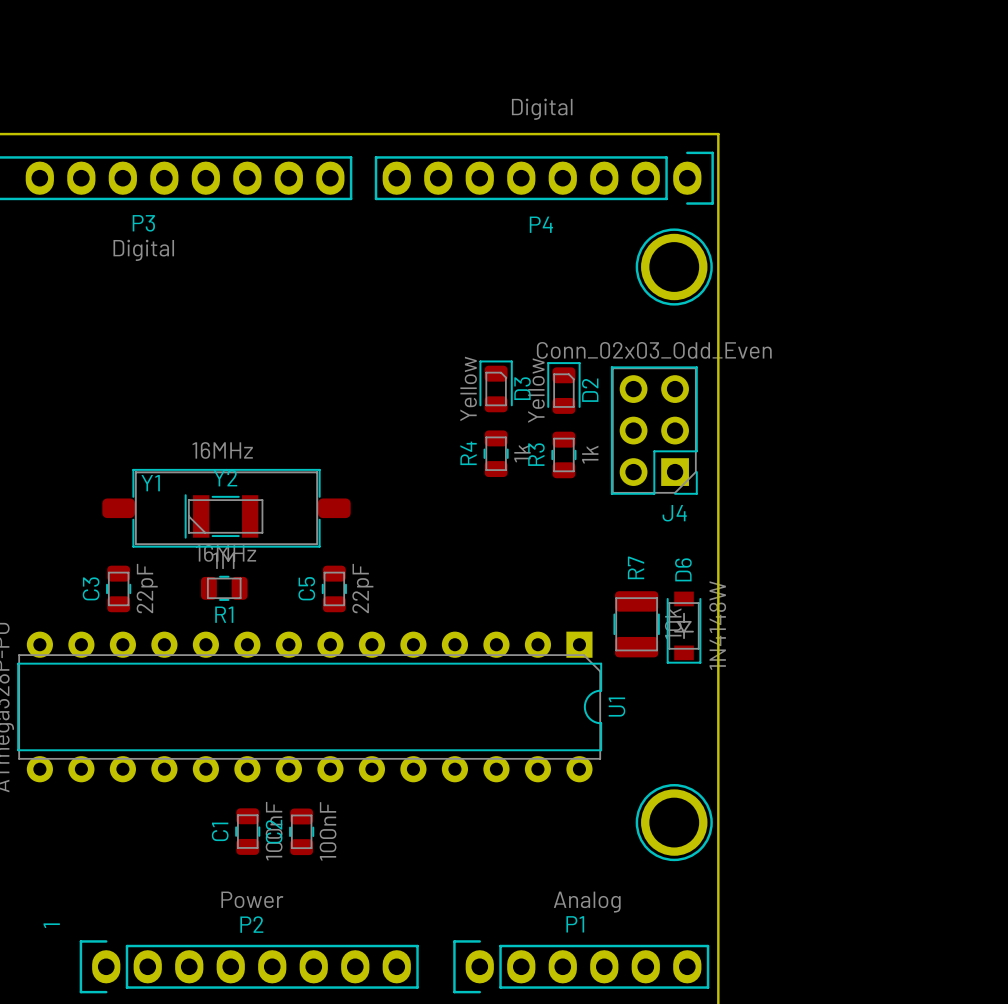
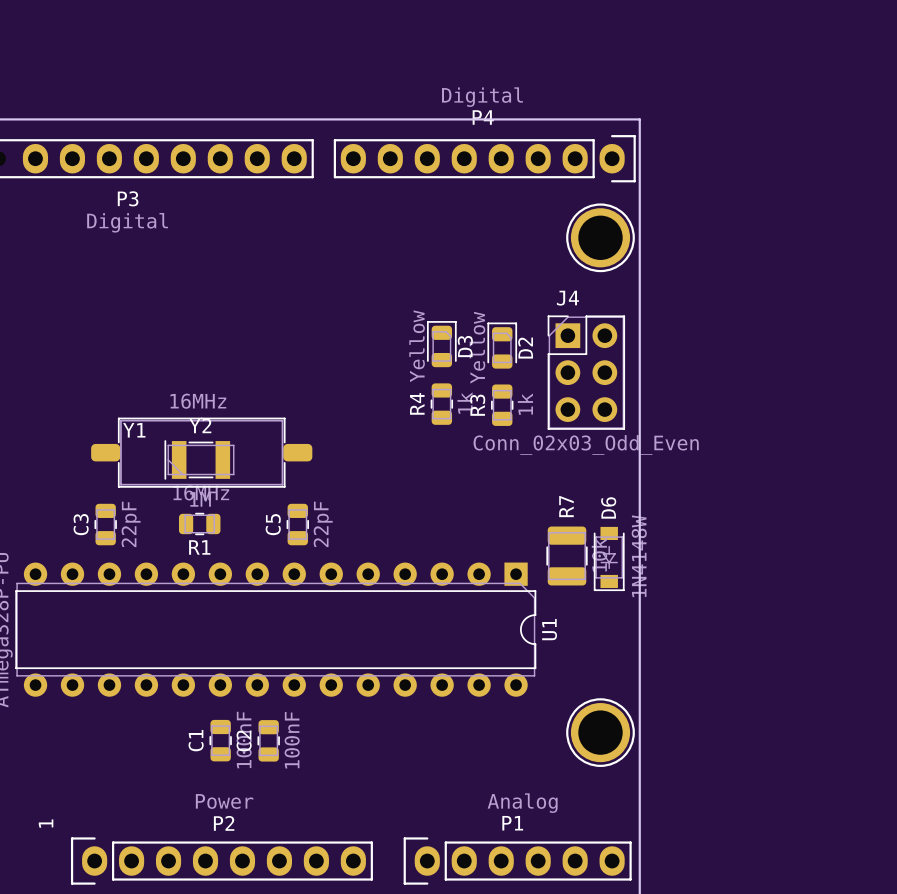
P4 name position: P4 (541, 224) -> P4 (483, 117)
J4 rotation: 0° (654, 430) -> 180° (586, 372)

